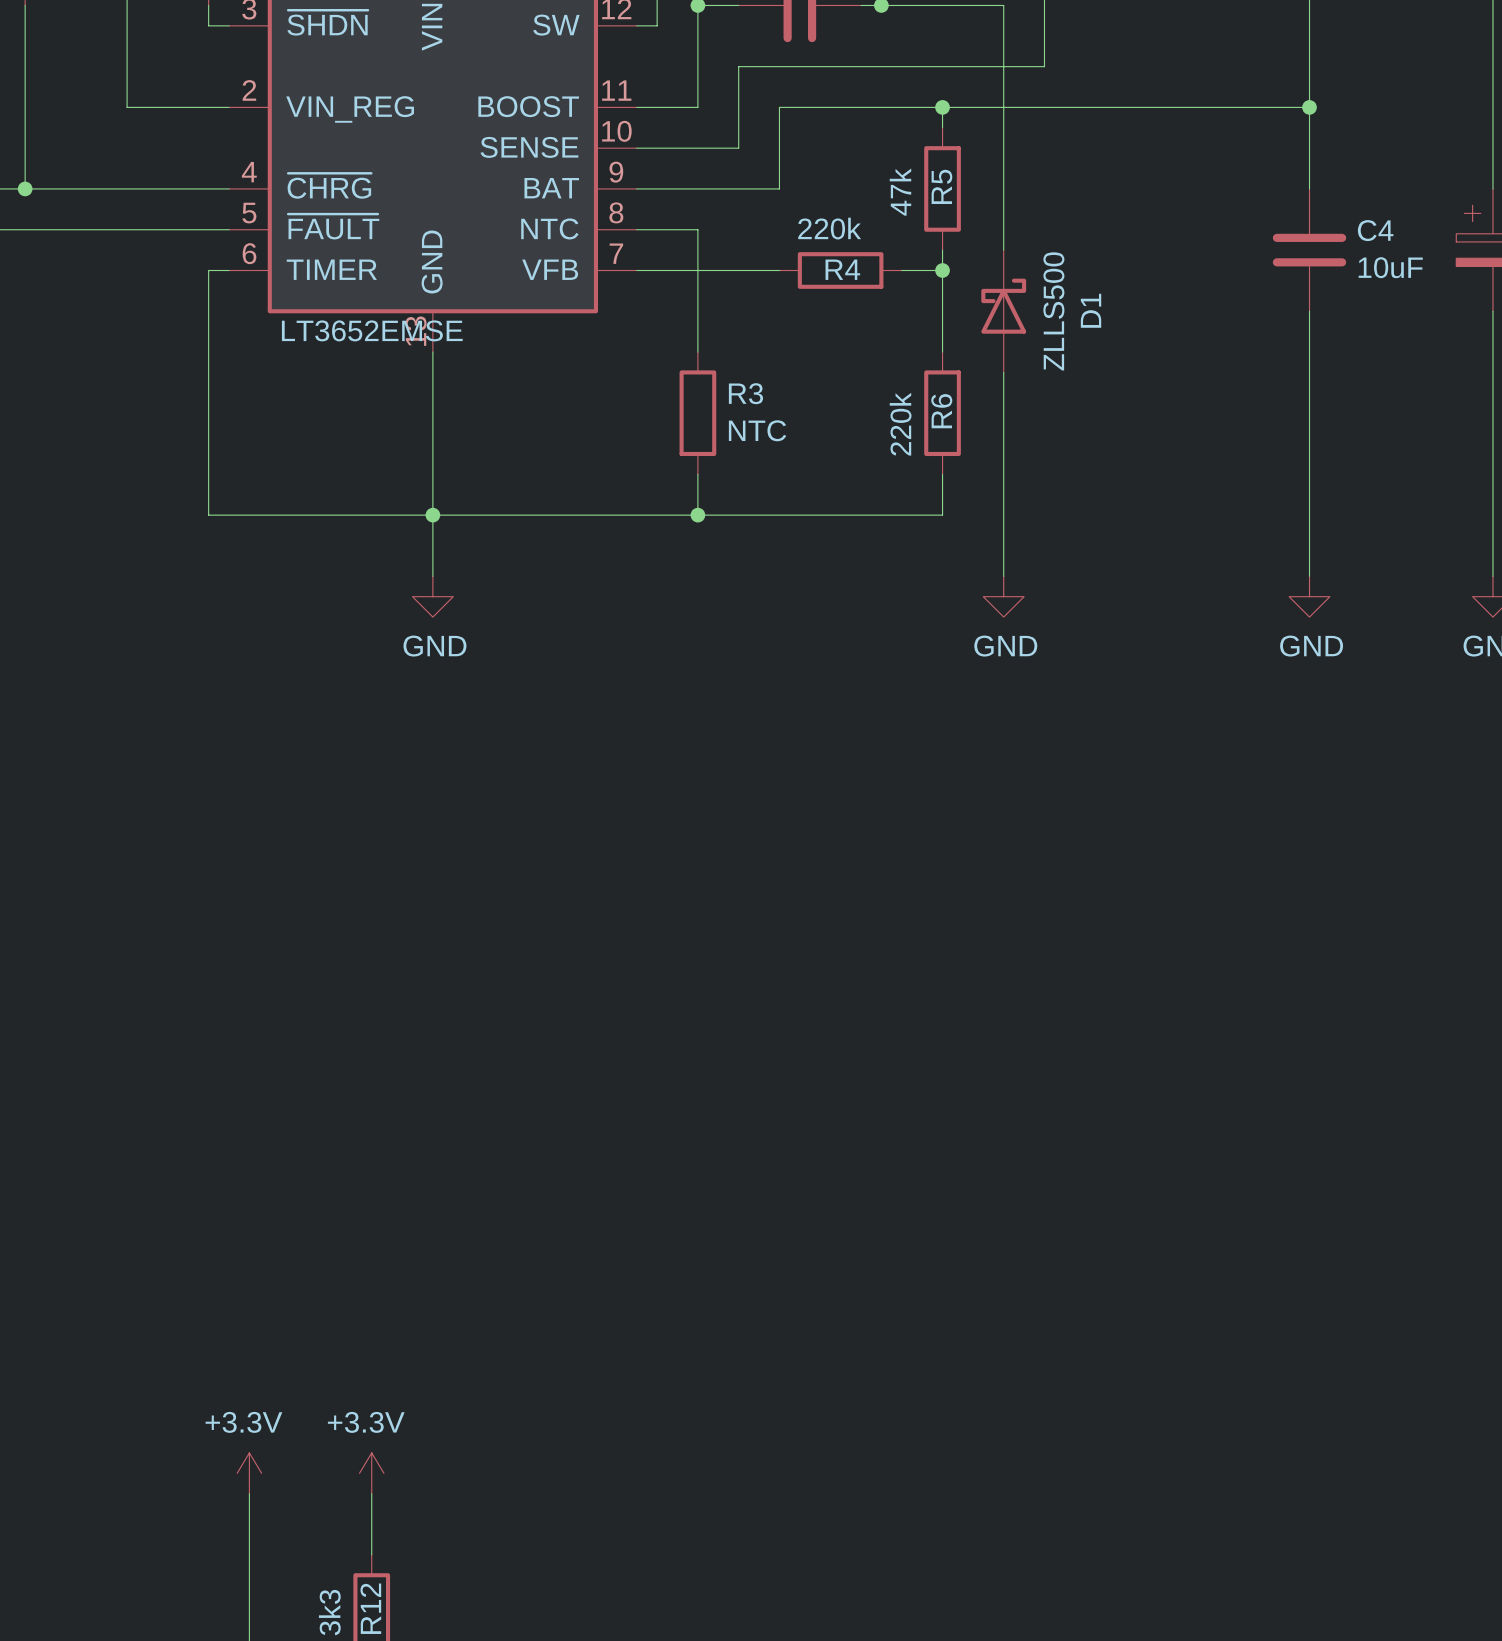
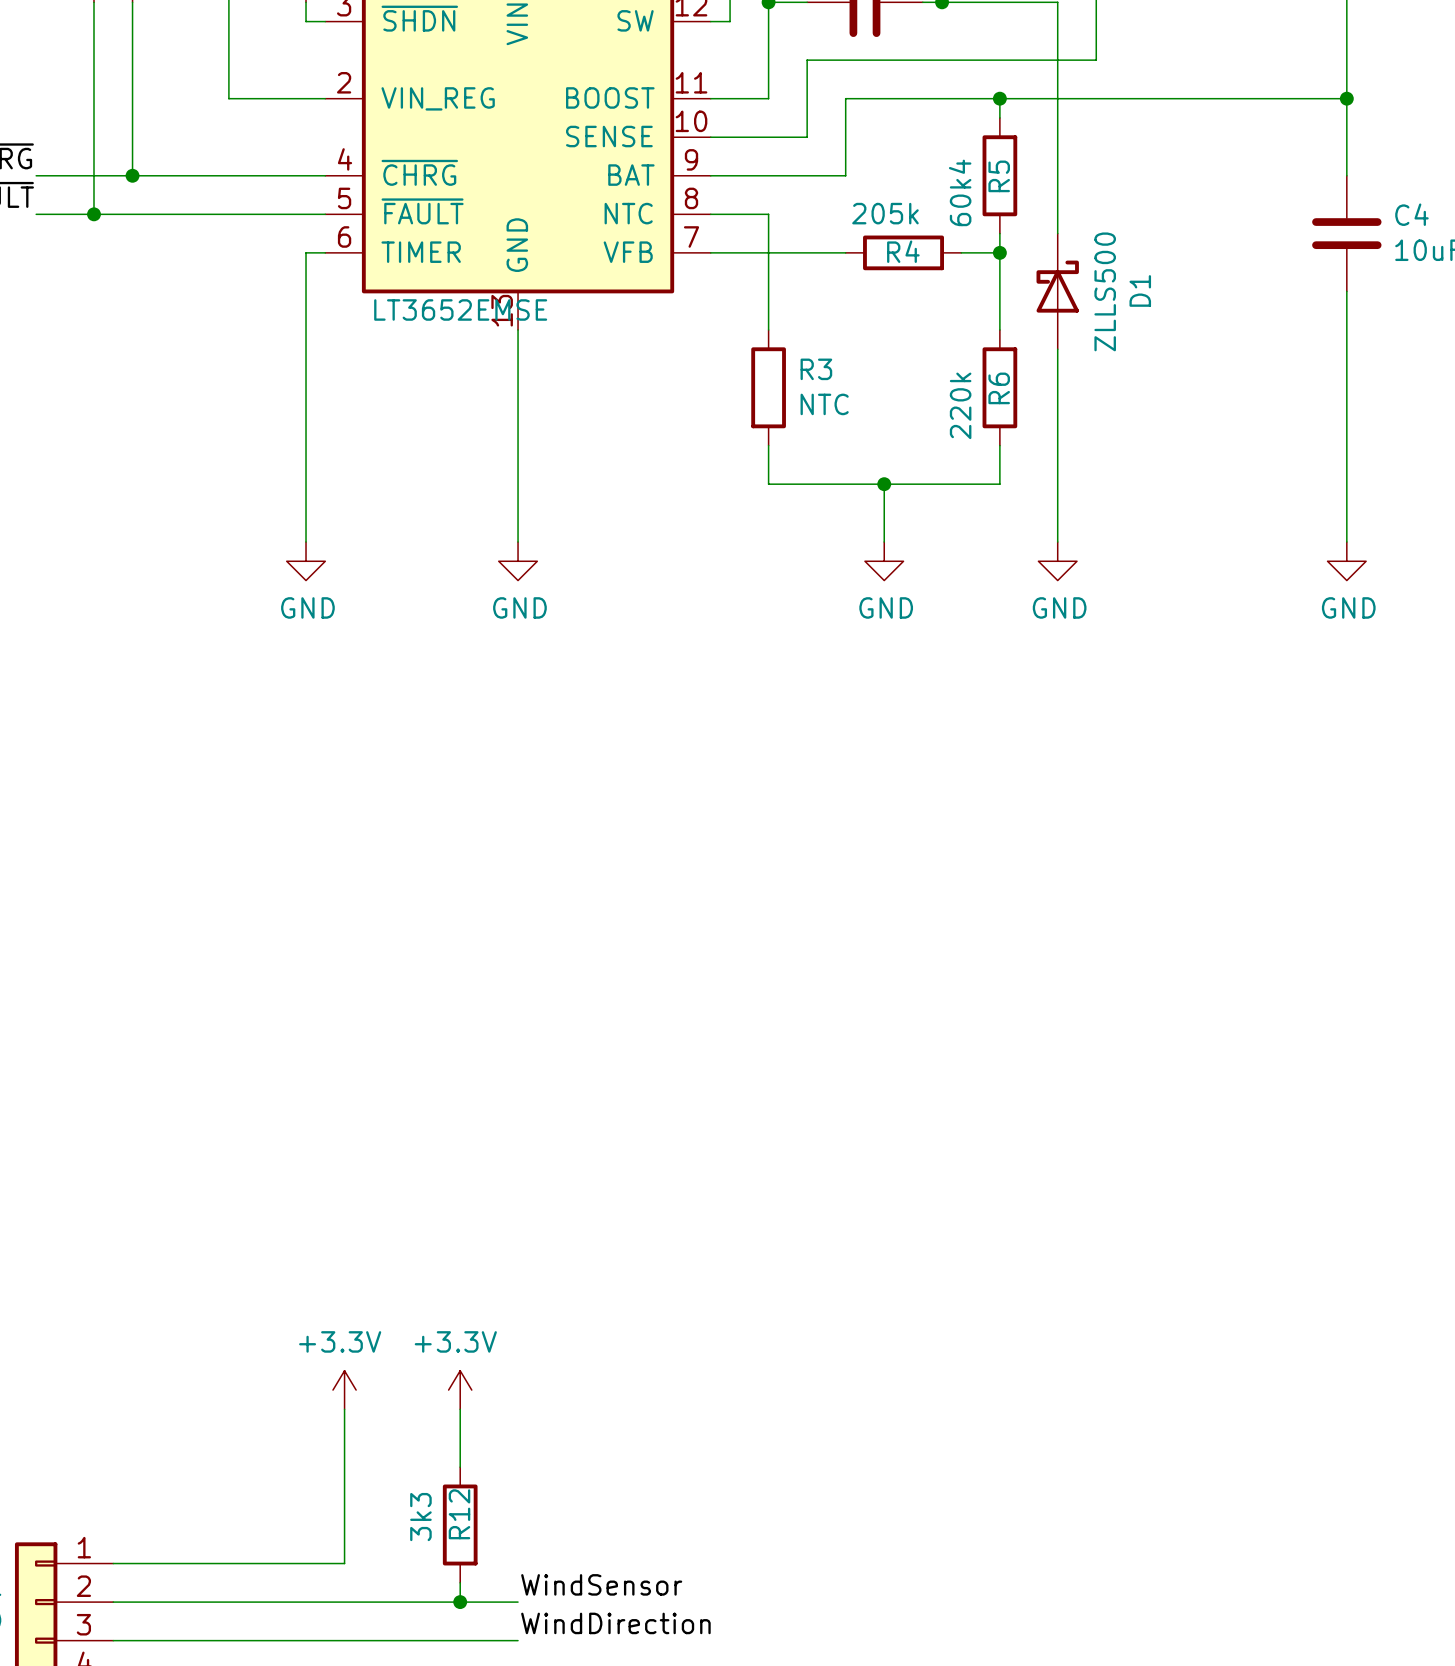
R5 value: 47k (900, 192) -> 60k4 (960, 192)
R4 value: 220k (829, 228) -> 205k (885, 213)
wire: (208, 515) (697, 515) -> (306, 484) (306, 541)
junction: (432, 515) -> none
junction: (697, 515) -> none
wire: none -> (884, 484) (884, 541)
junction: none -> (884, 484)
power symbol: none -> GND (306, 561)
power symbol: none -> GND (884, 561)

